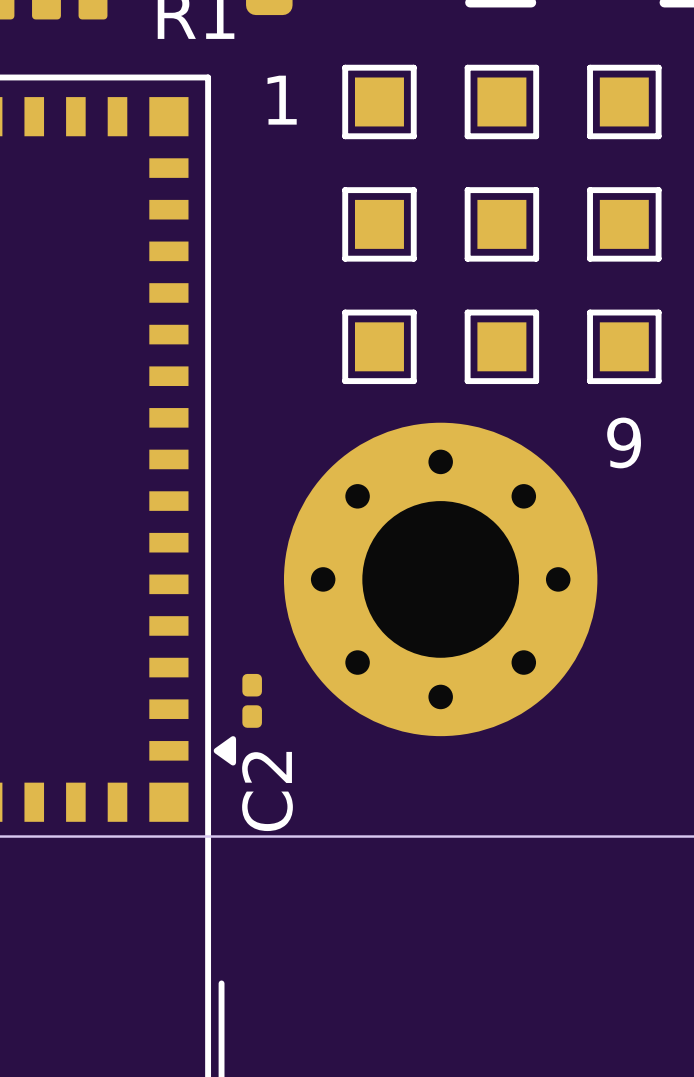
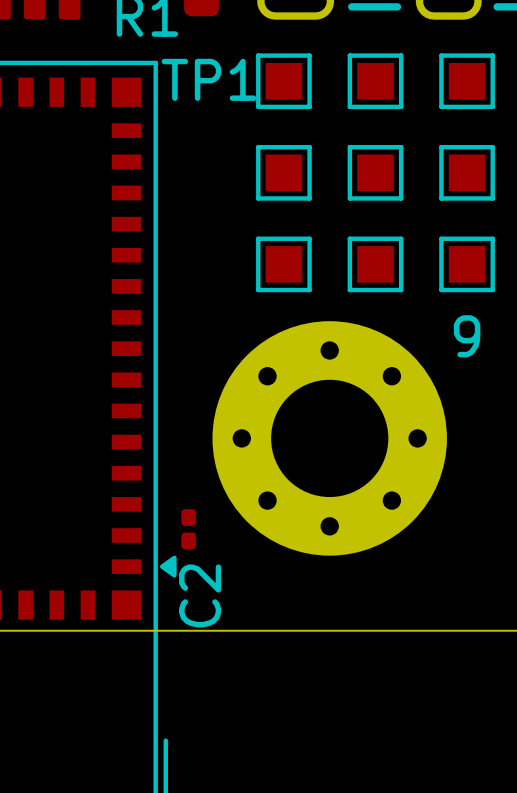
1 name: 1 (282, 100) -> TP1 (208, 79)

